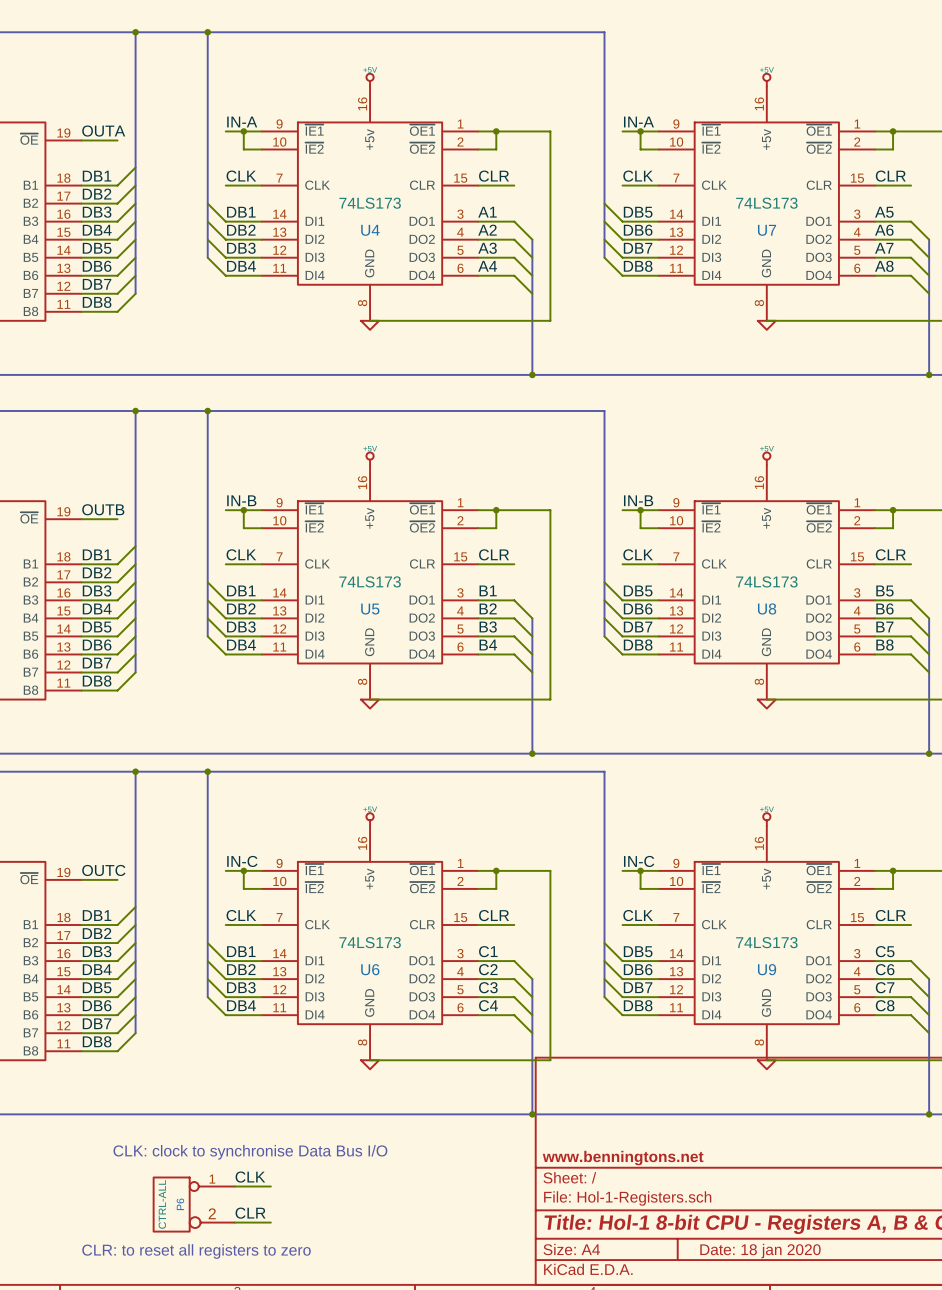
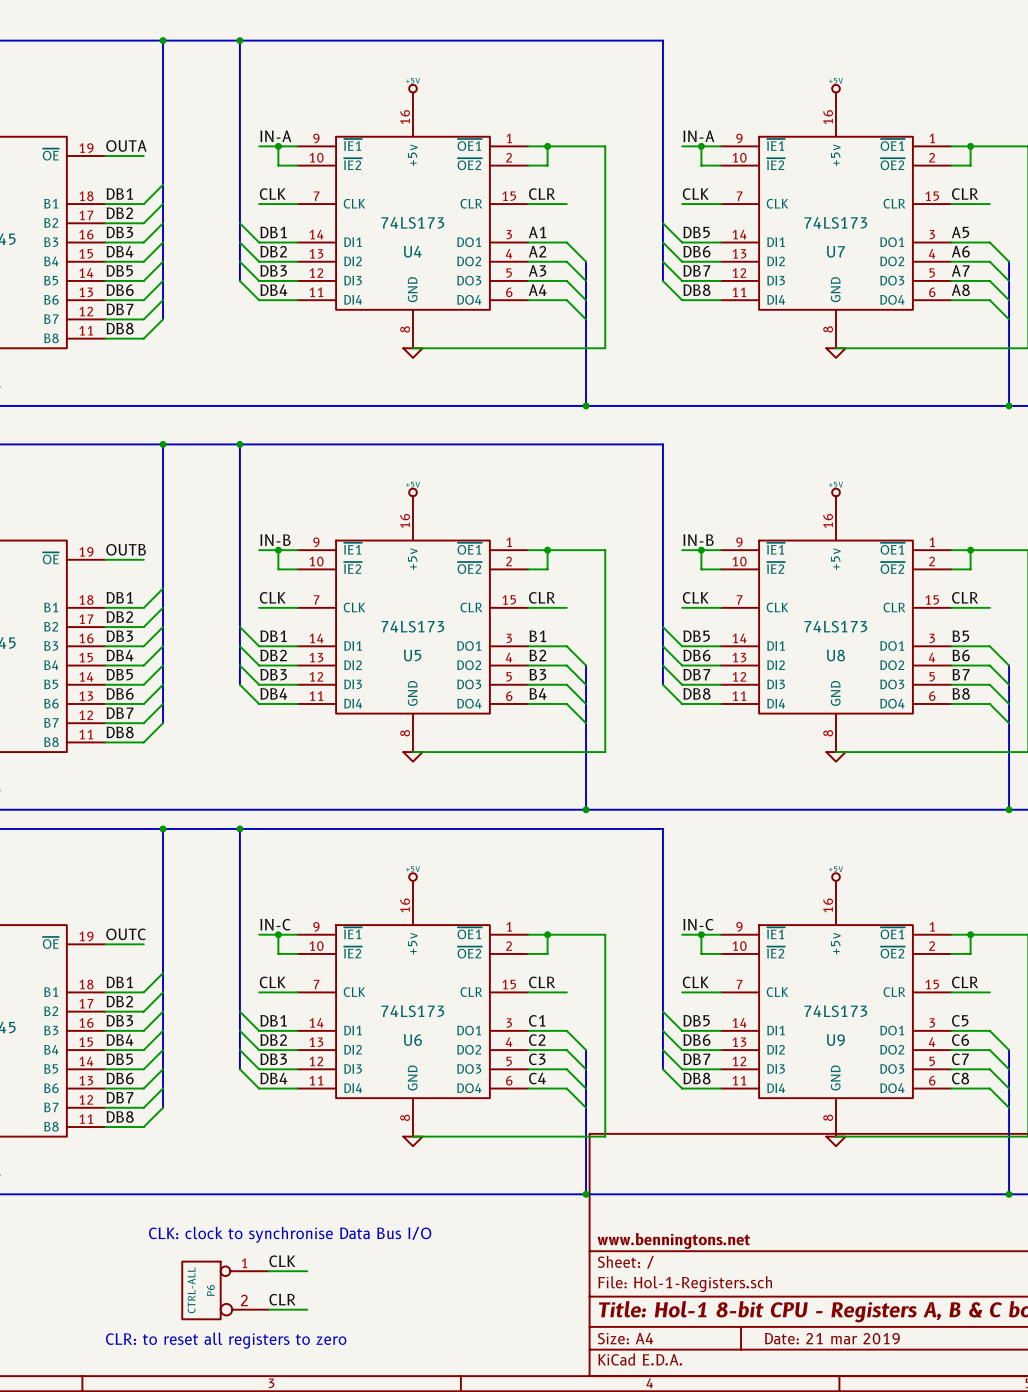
title block: Date: 18 jan 2020 (760, 1251) -> Date: 21 mar 2019 (832, 1338)

